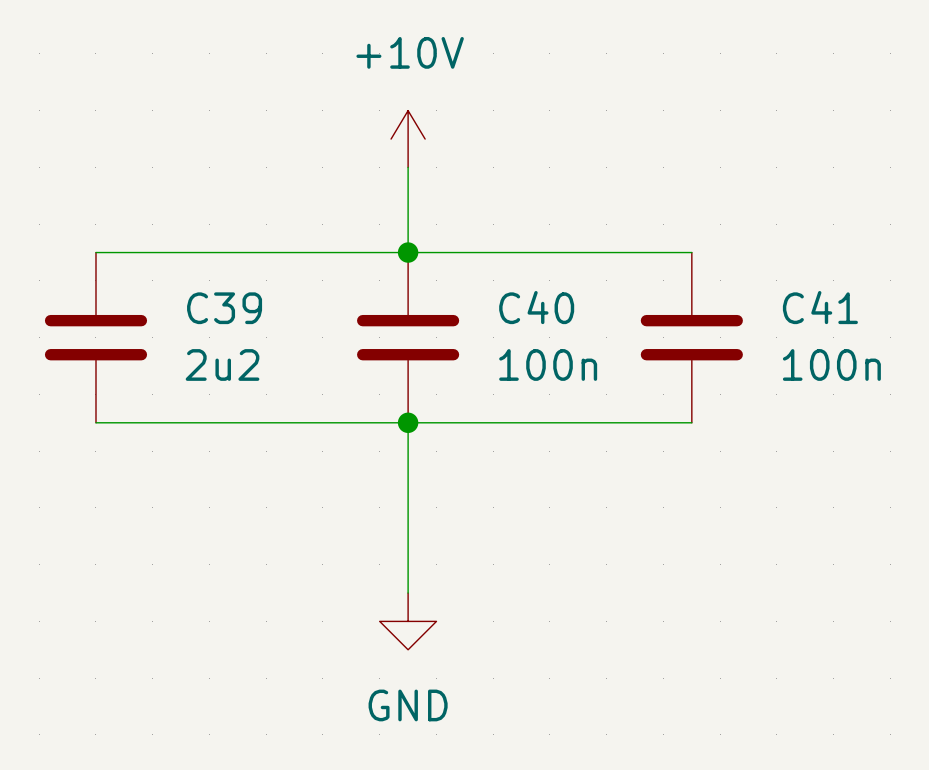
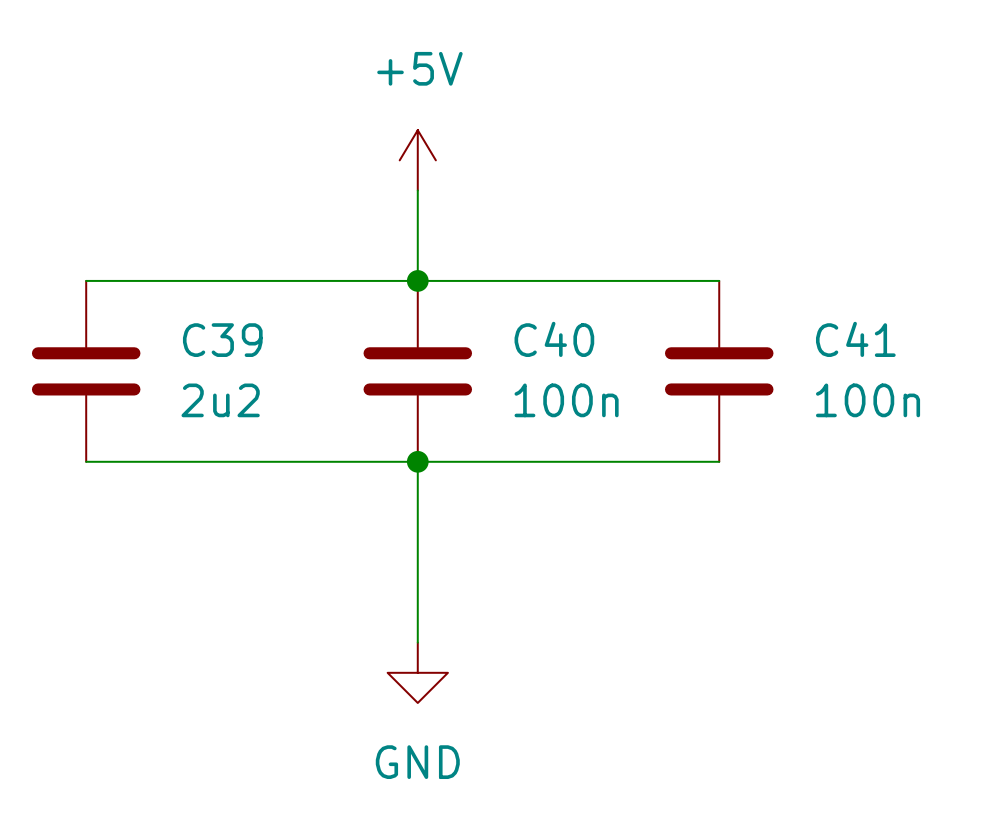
power symbol: +10V (408, 139) -> +5V (417, 160)

